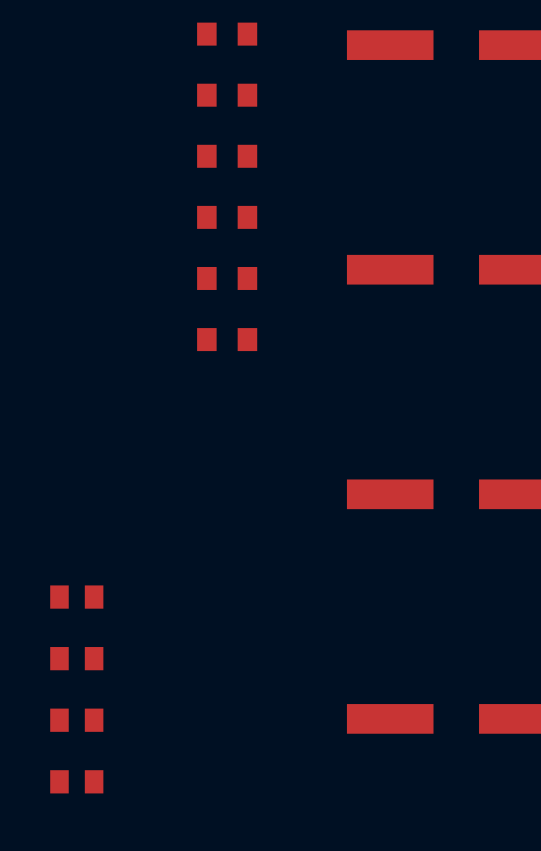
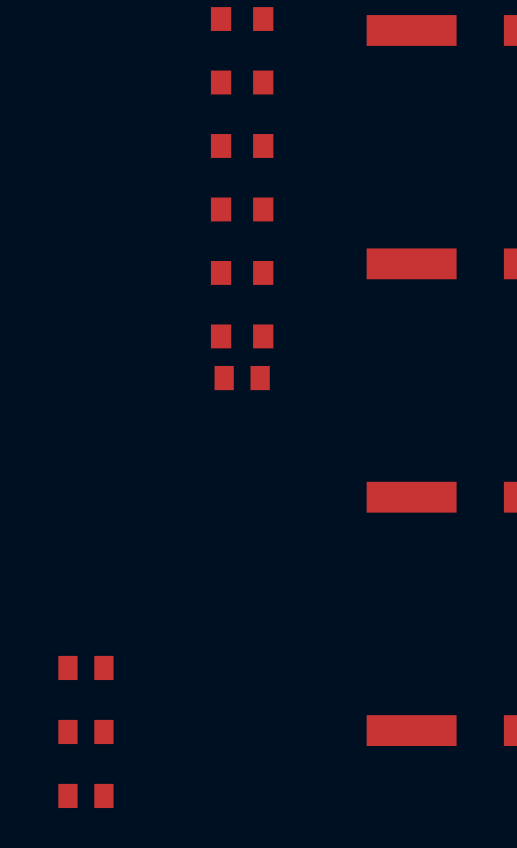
part position: (76, 597) -> (242, 378)

